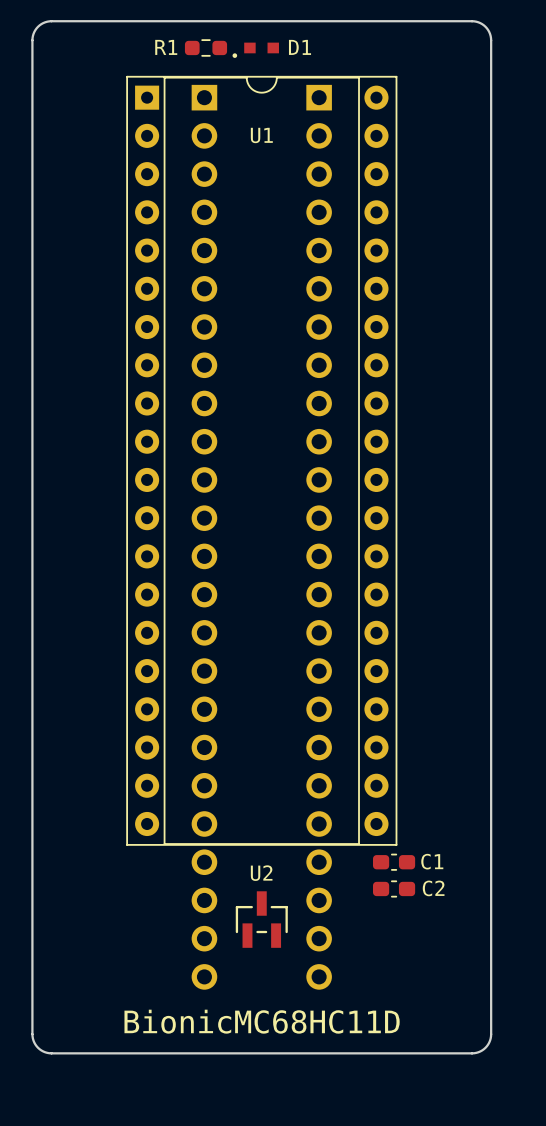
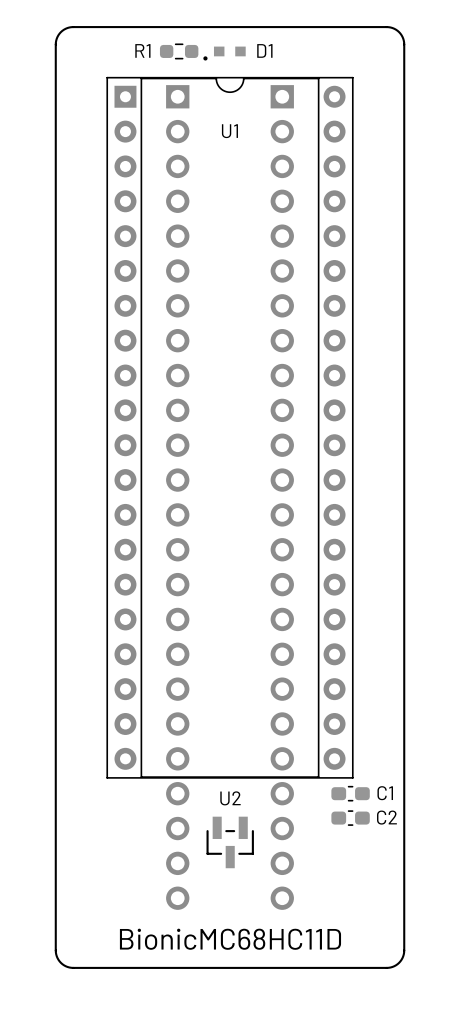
board edge: (89, 21) (45, 22) (36, 28) (32, 40) (32, 1036) (36, 1046) (45, 1052) (89, 1053) -> (73, 27) (60, 32) (55, 44) (55, 950) (60, 962) (73, 967)
board edge: (433, 21) (478, 22) (488, 30) (491, 40) (491, 1036) (486, 1046) (478, 1052) (433, 1053) -> (386, 27) (399, 32) (404, 44) (404, 950) (399, 962) (386, 967)
U2 rotation: 0° (261, 919) -> 180° (230, 842)

